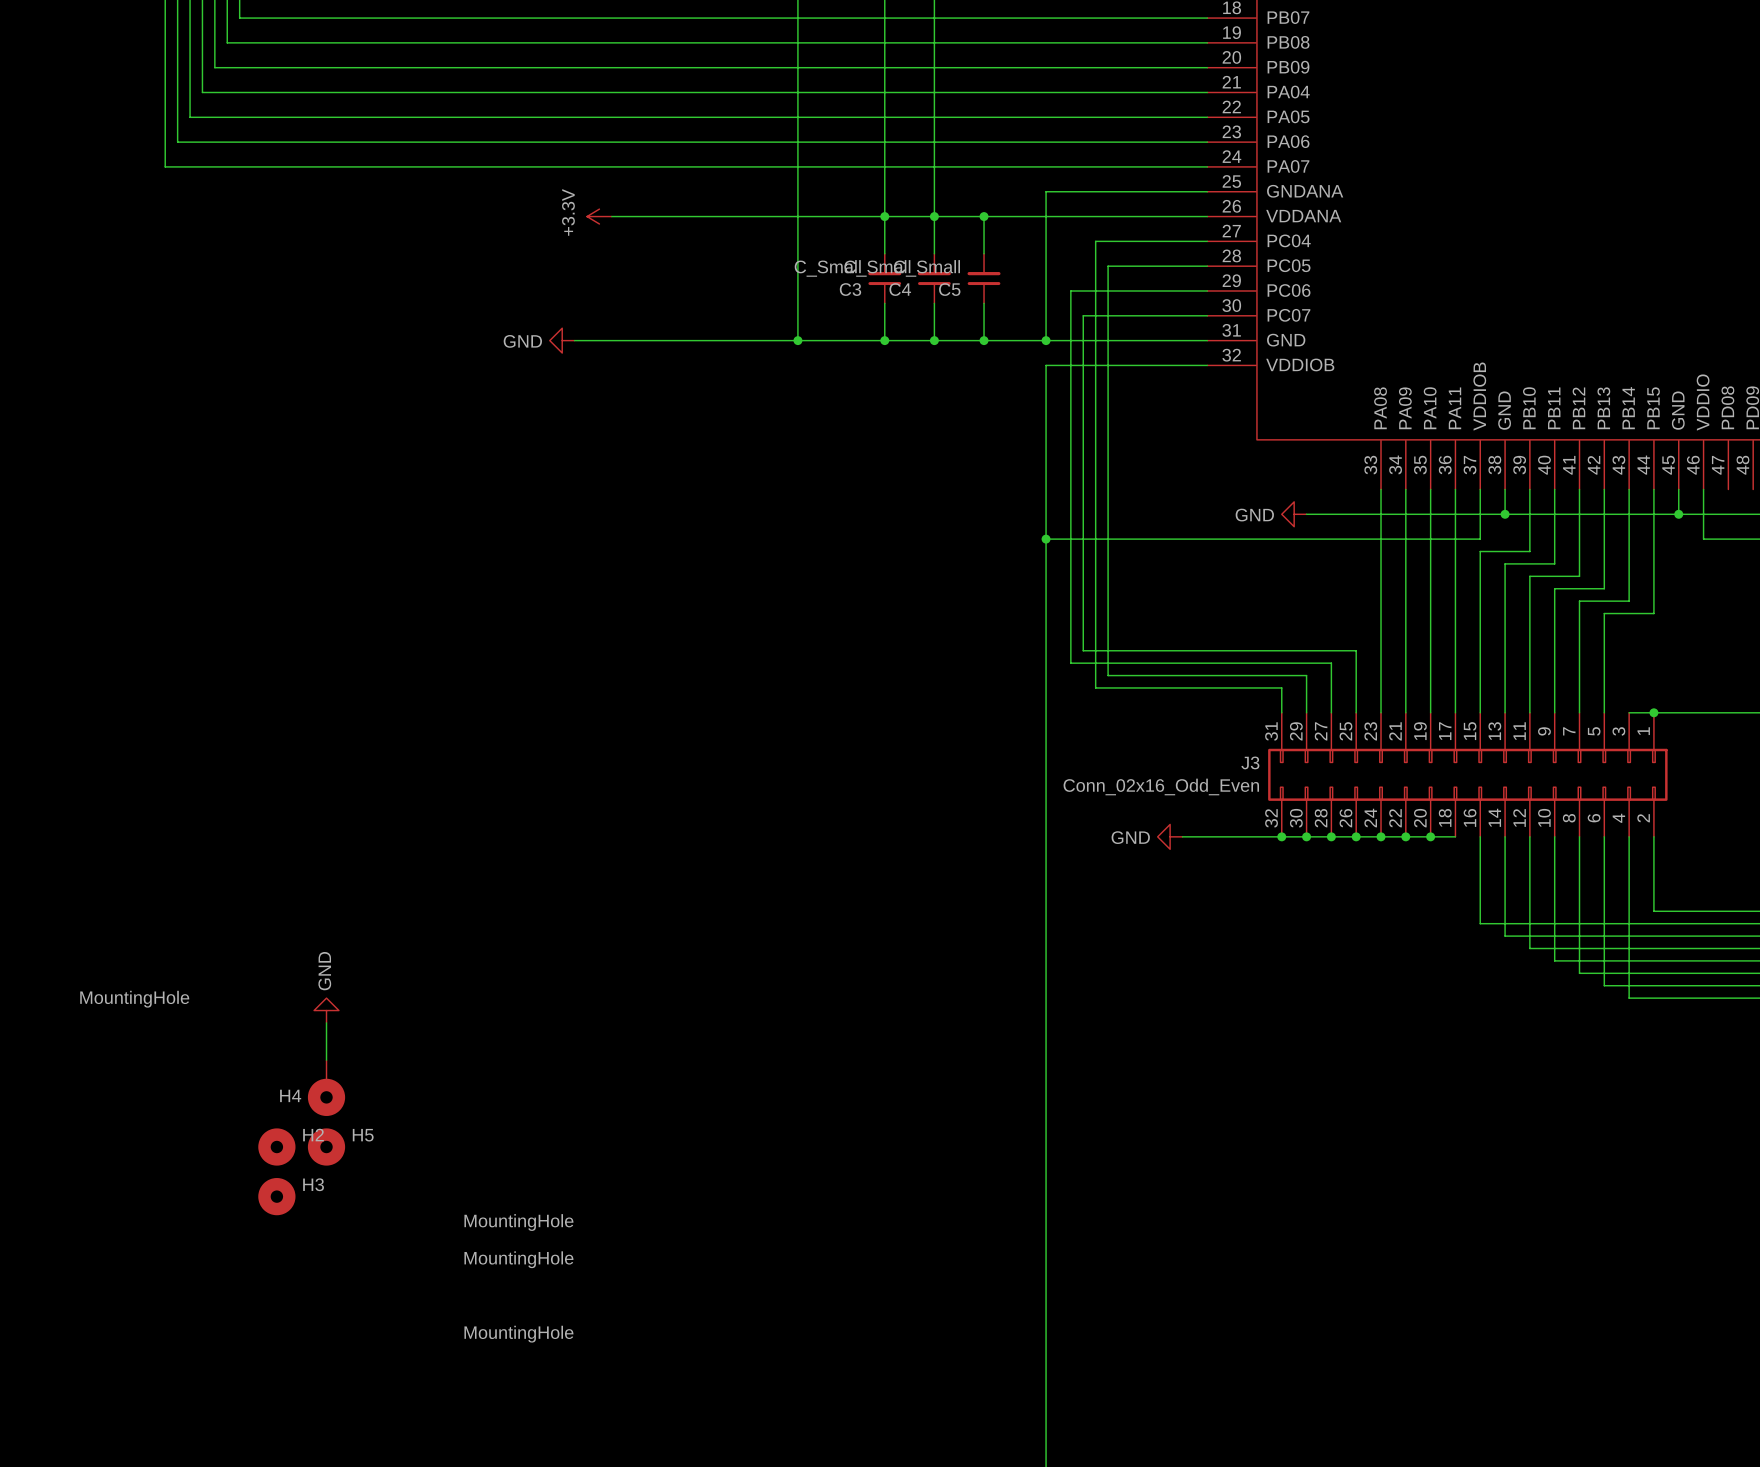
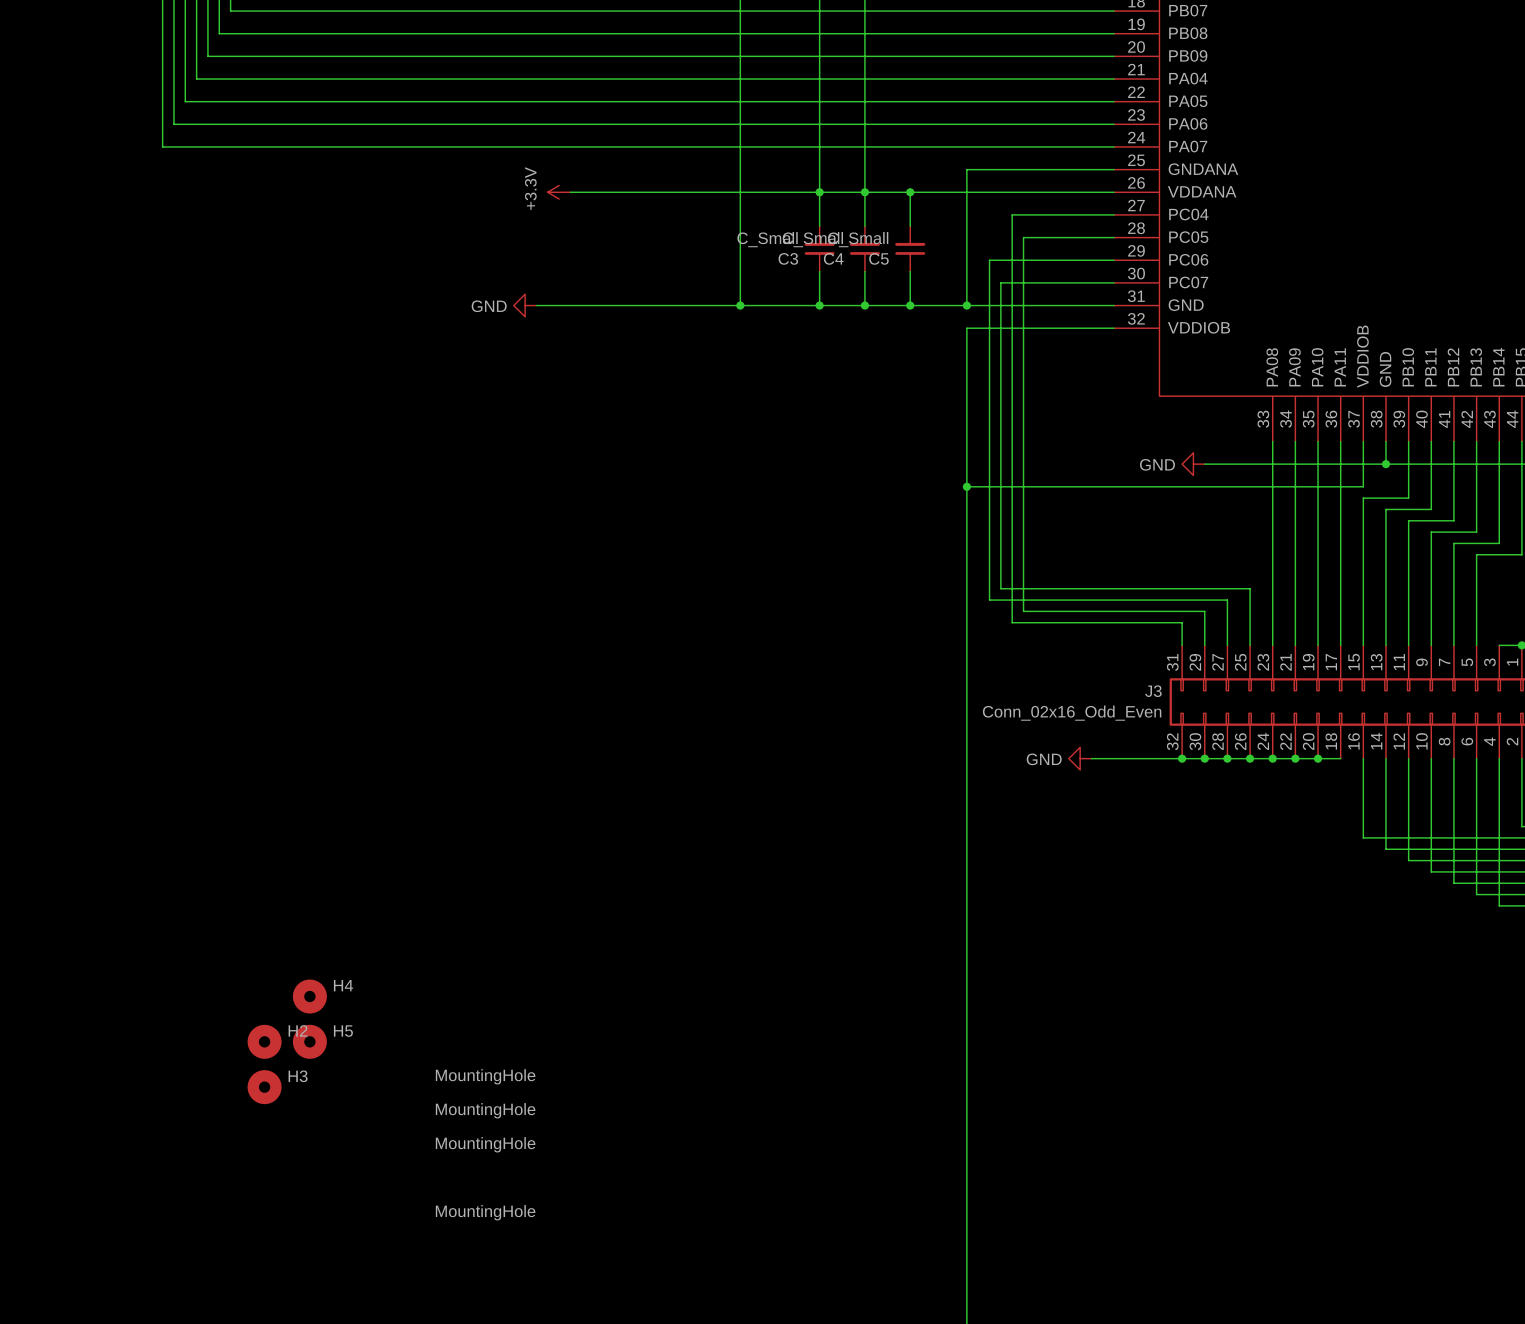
H4 value position: MountingHole (134, 999) -> MountingHole (485, 1076)
power symbol: GND (326, 1010) -> none
wire: (326, 1022) (326, 1060) -> none
H4 symbol: [307, 1060, 346, 1116] -> [292, 979, 327, 1014]
H4 name position: H4 (290, 1095) -> H4 (343, 985)

